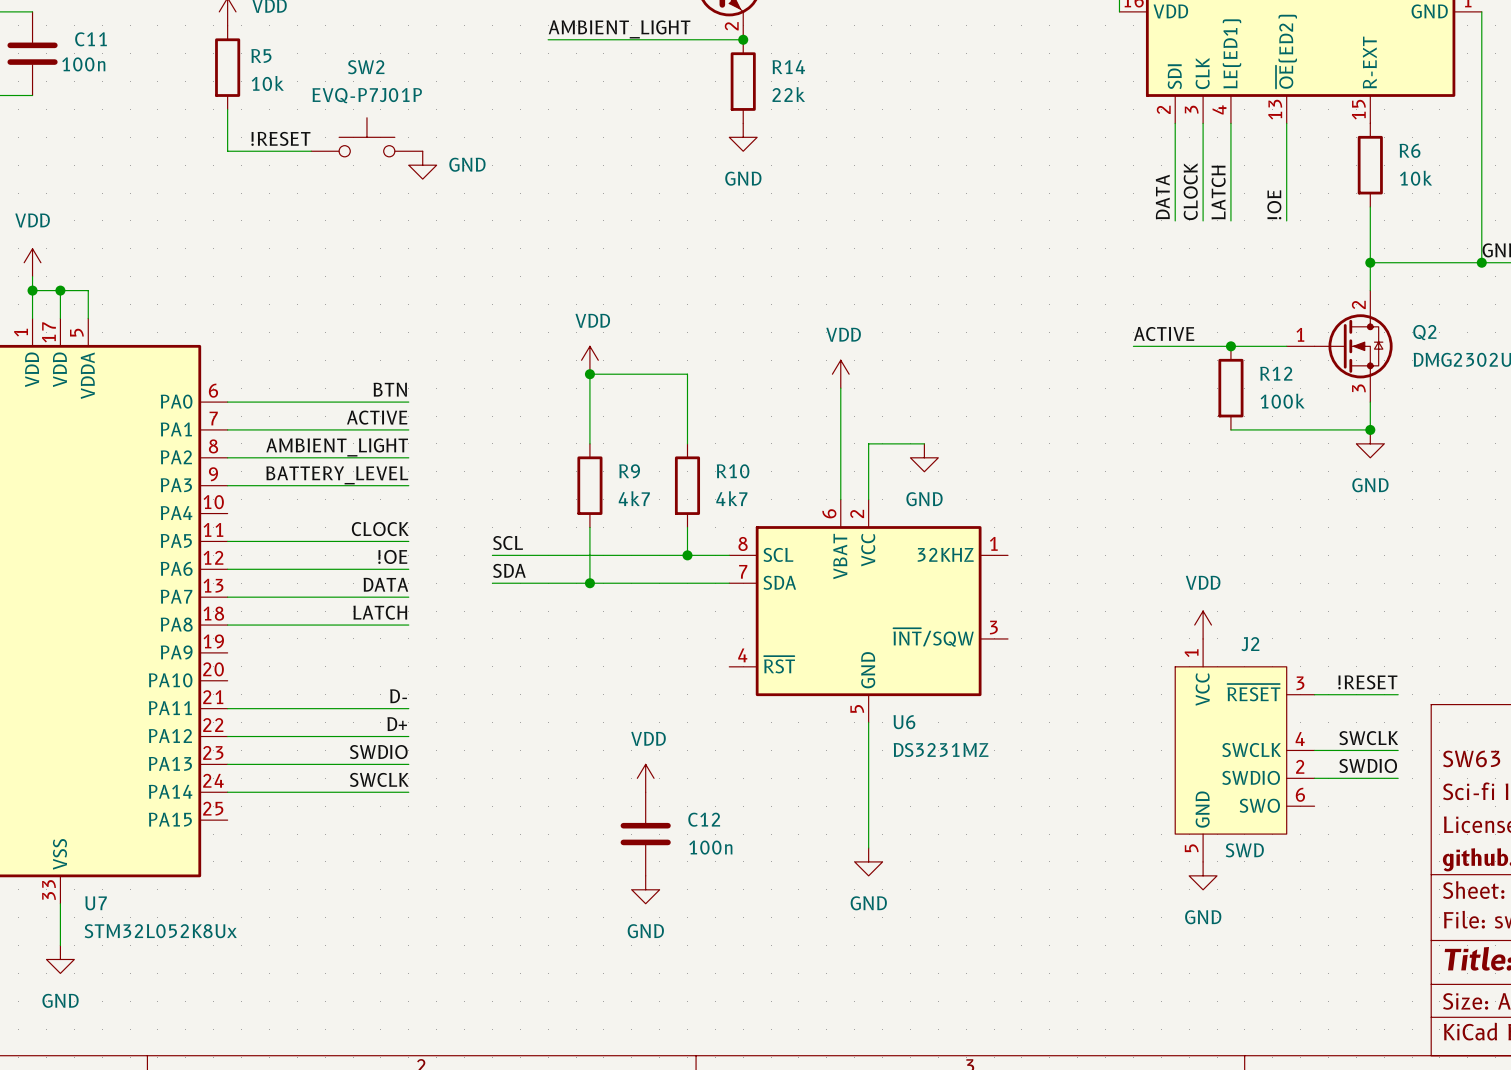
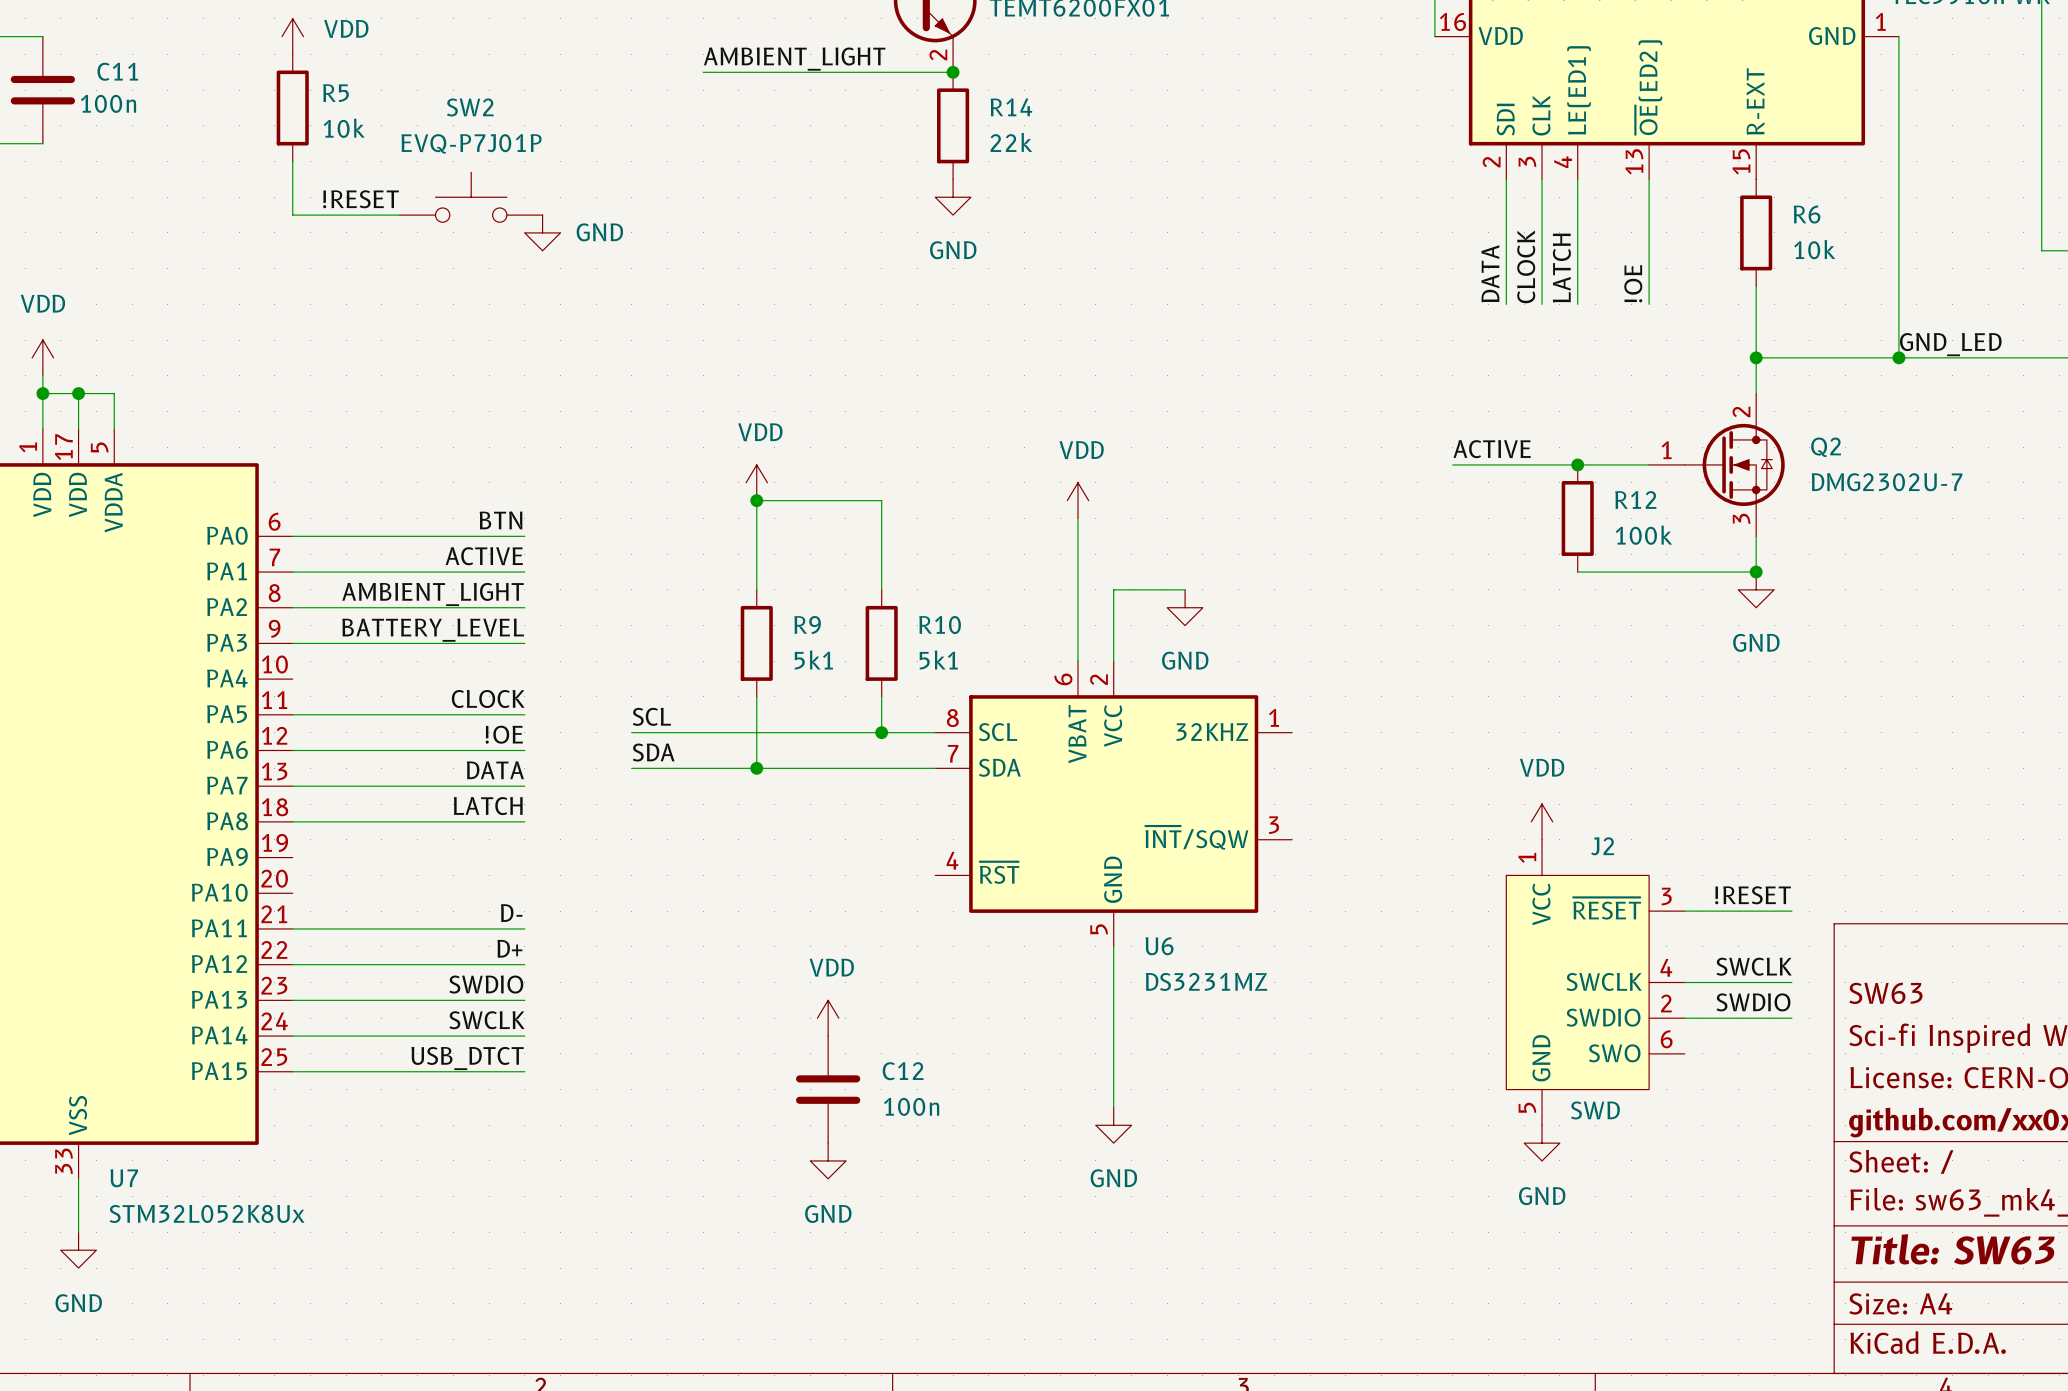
R9 value: 4k7 (634, 498) -> 5k1 (813, 660)
R10 value: 4k7 (731, 498) -> 5k1 (938, 660)
label: none -> USB_DTCT (467, 1058)
wire: none -> (292, 1071) (524, 1071)

